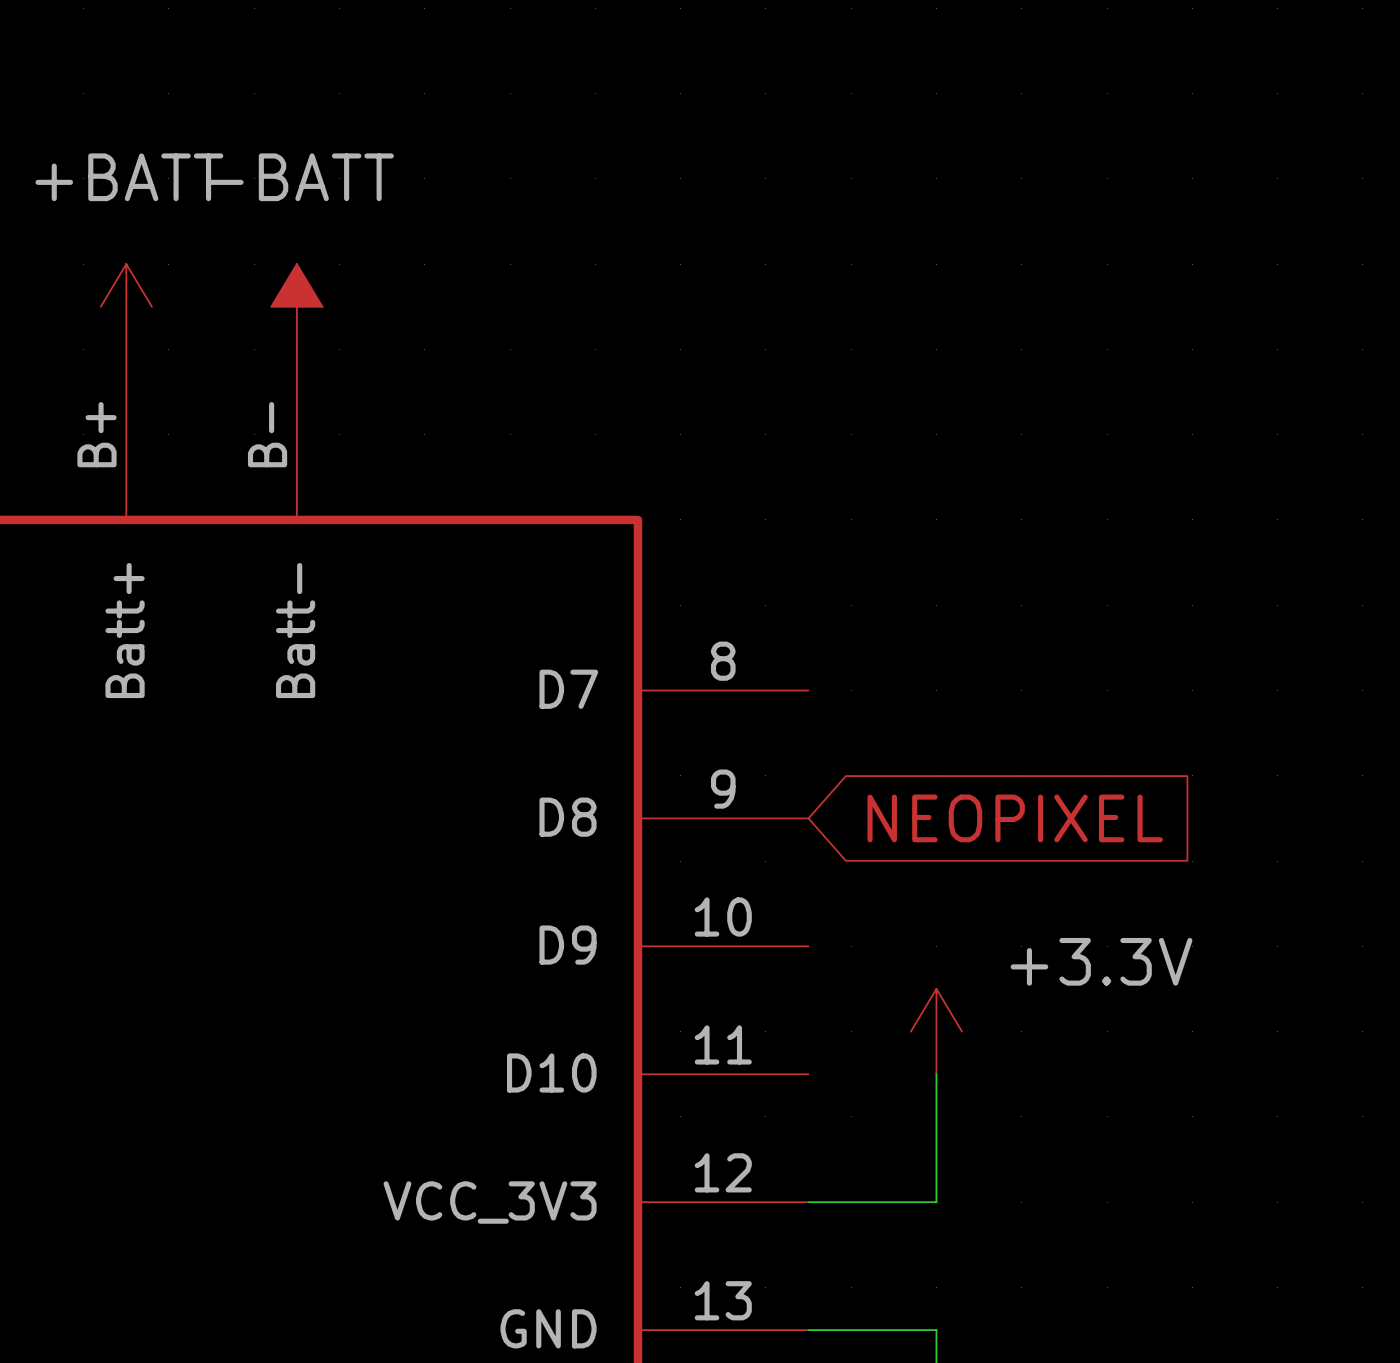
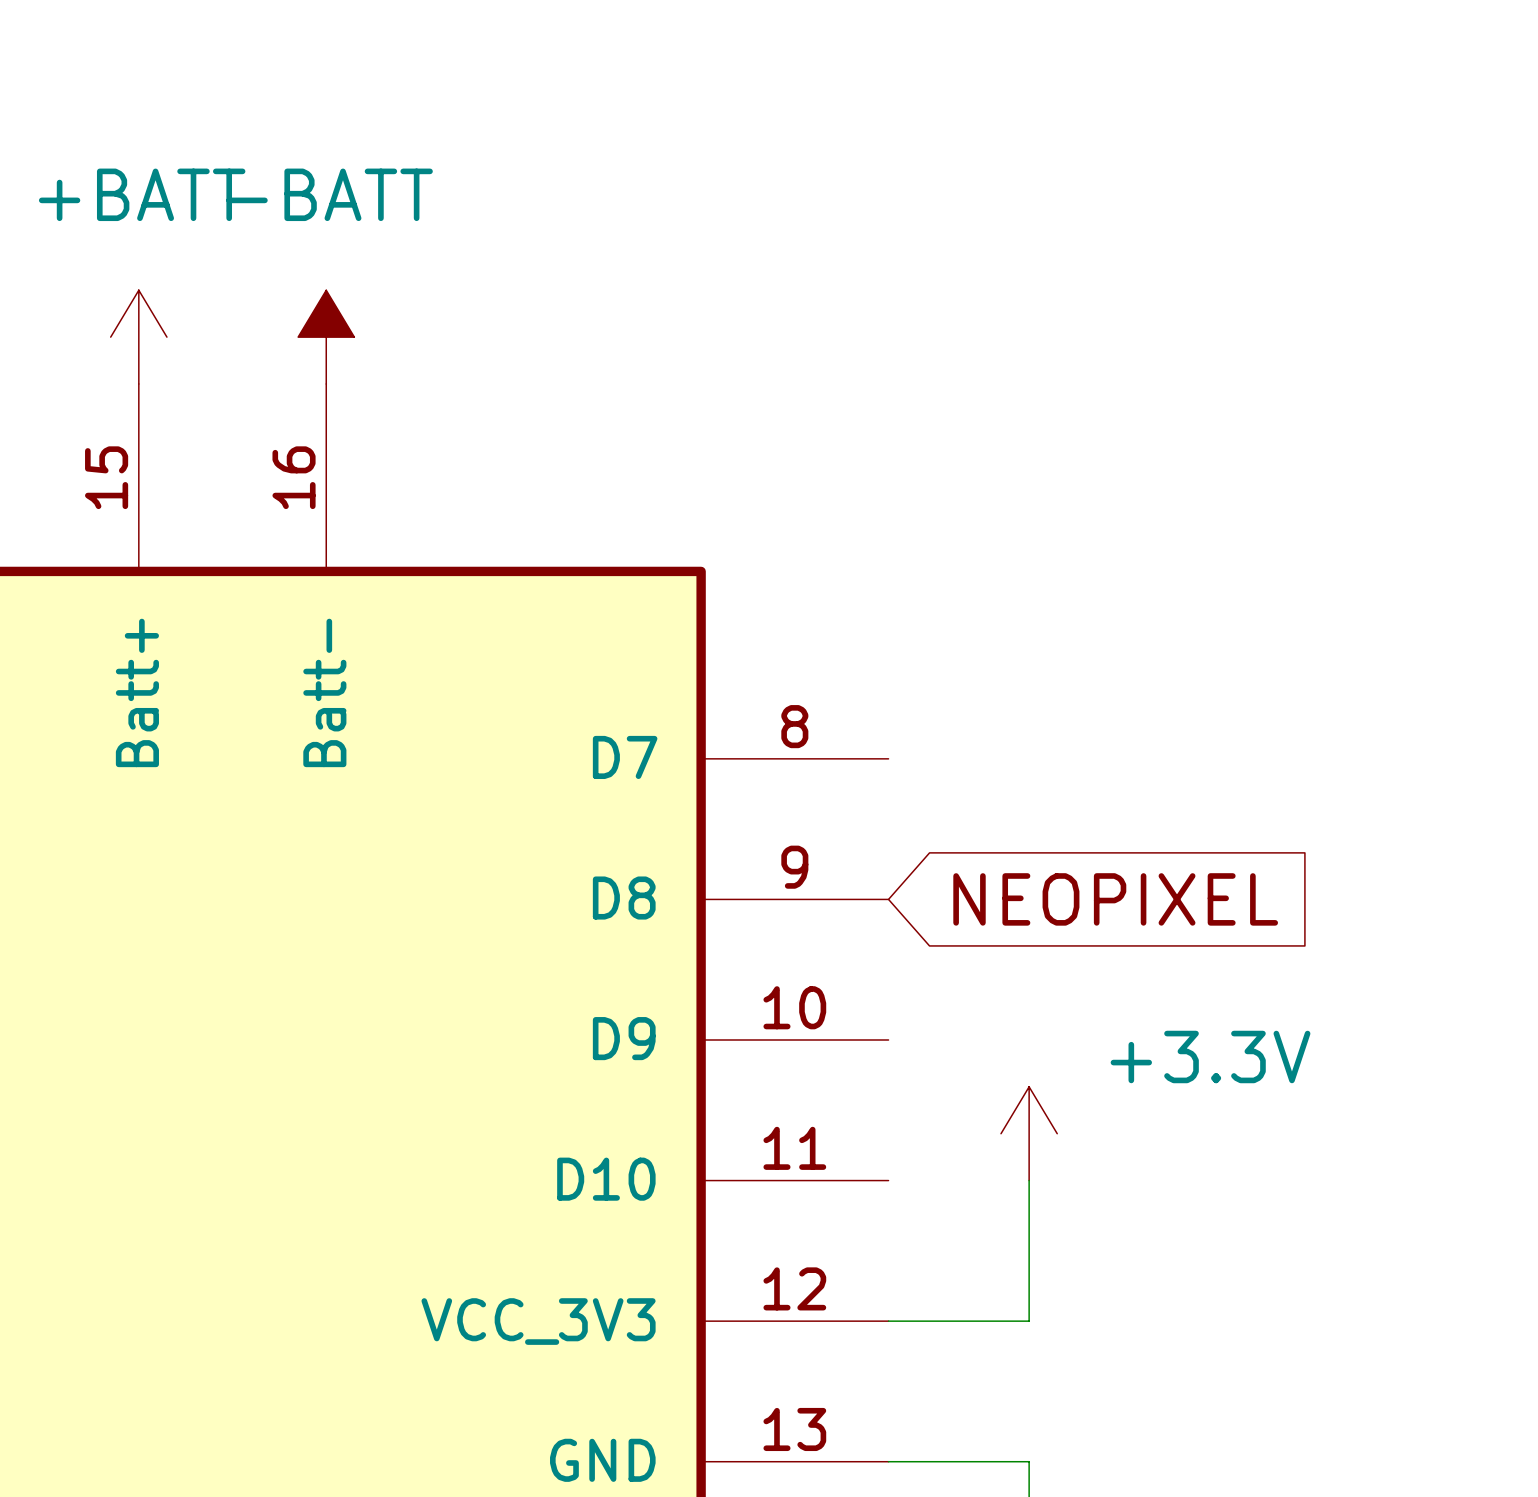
part pin number: B+ (96, 434) -> 15 (106, 477)
part pin number: B- (267, 434) -> 16 (294, 477)

